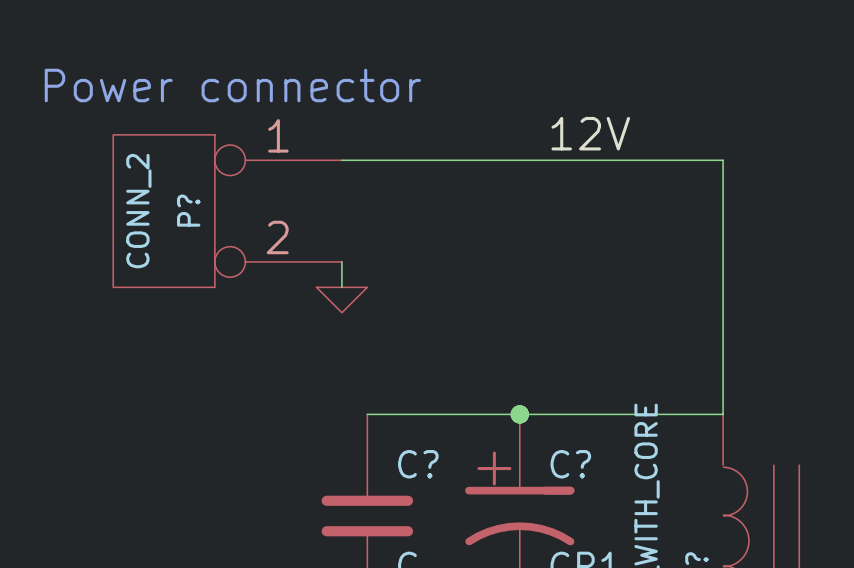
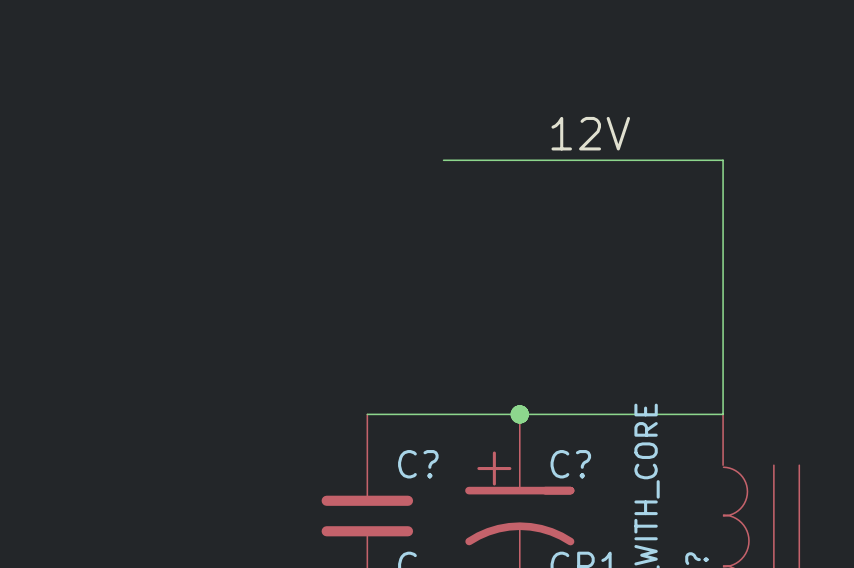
text: Power connector (232, 85) -> none
wire: (341, 160) (443, 160) -> none
P?: CONN_2 (227, 211) -> none
wire: (341, 261) (341, 287) -> none
power symbol: (341, 300) -> none

